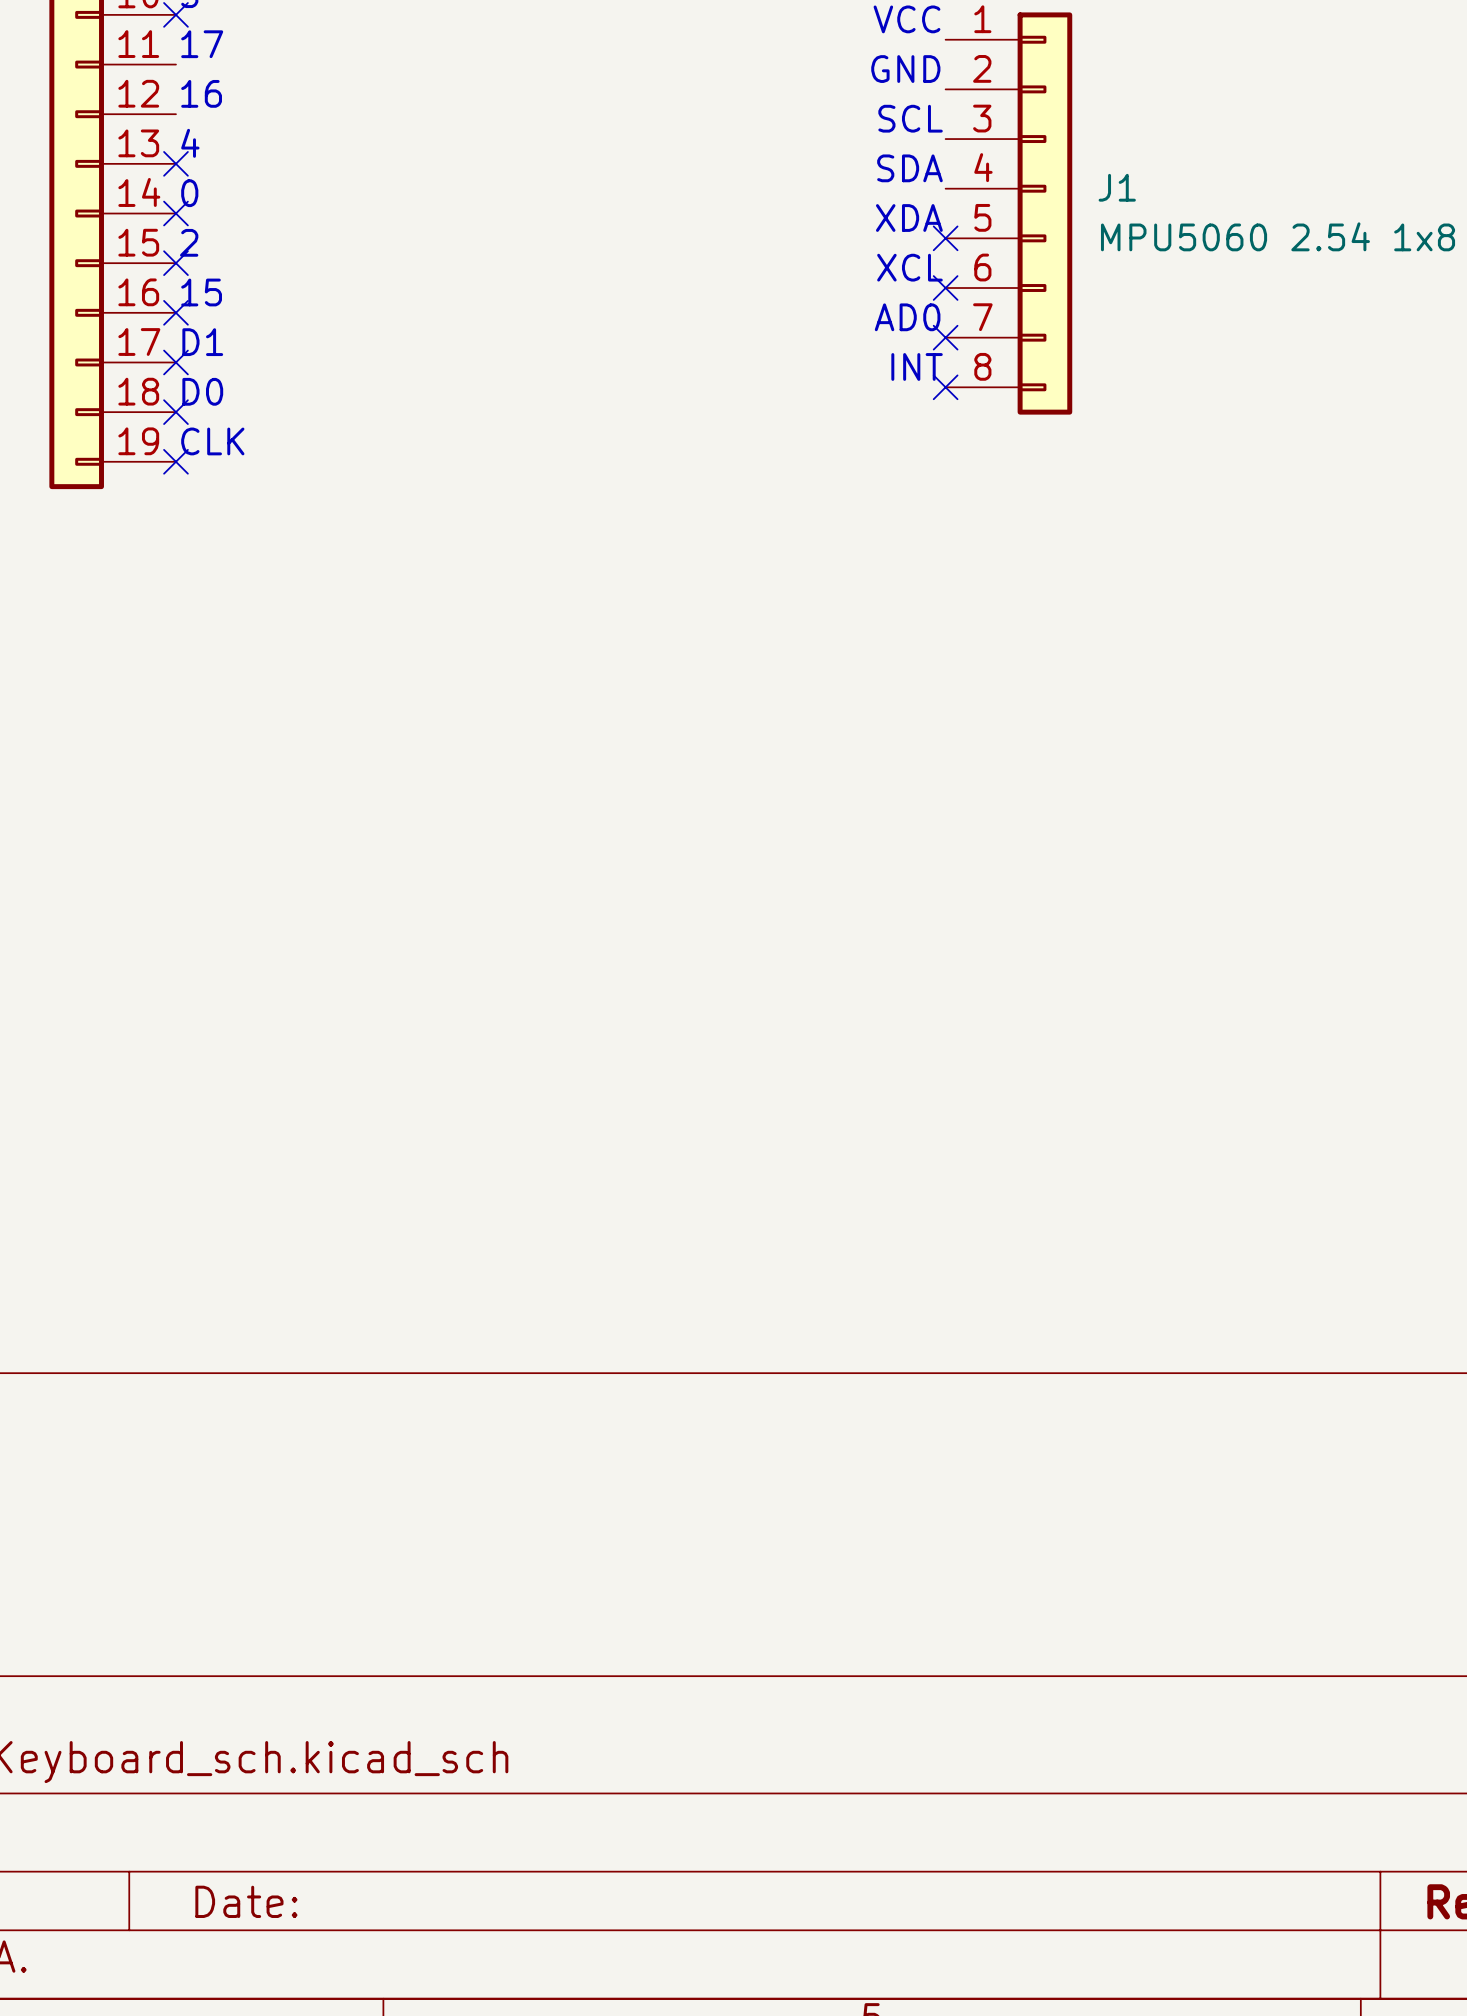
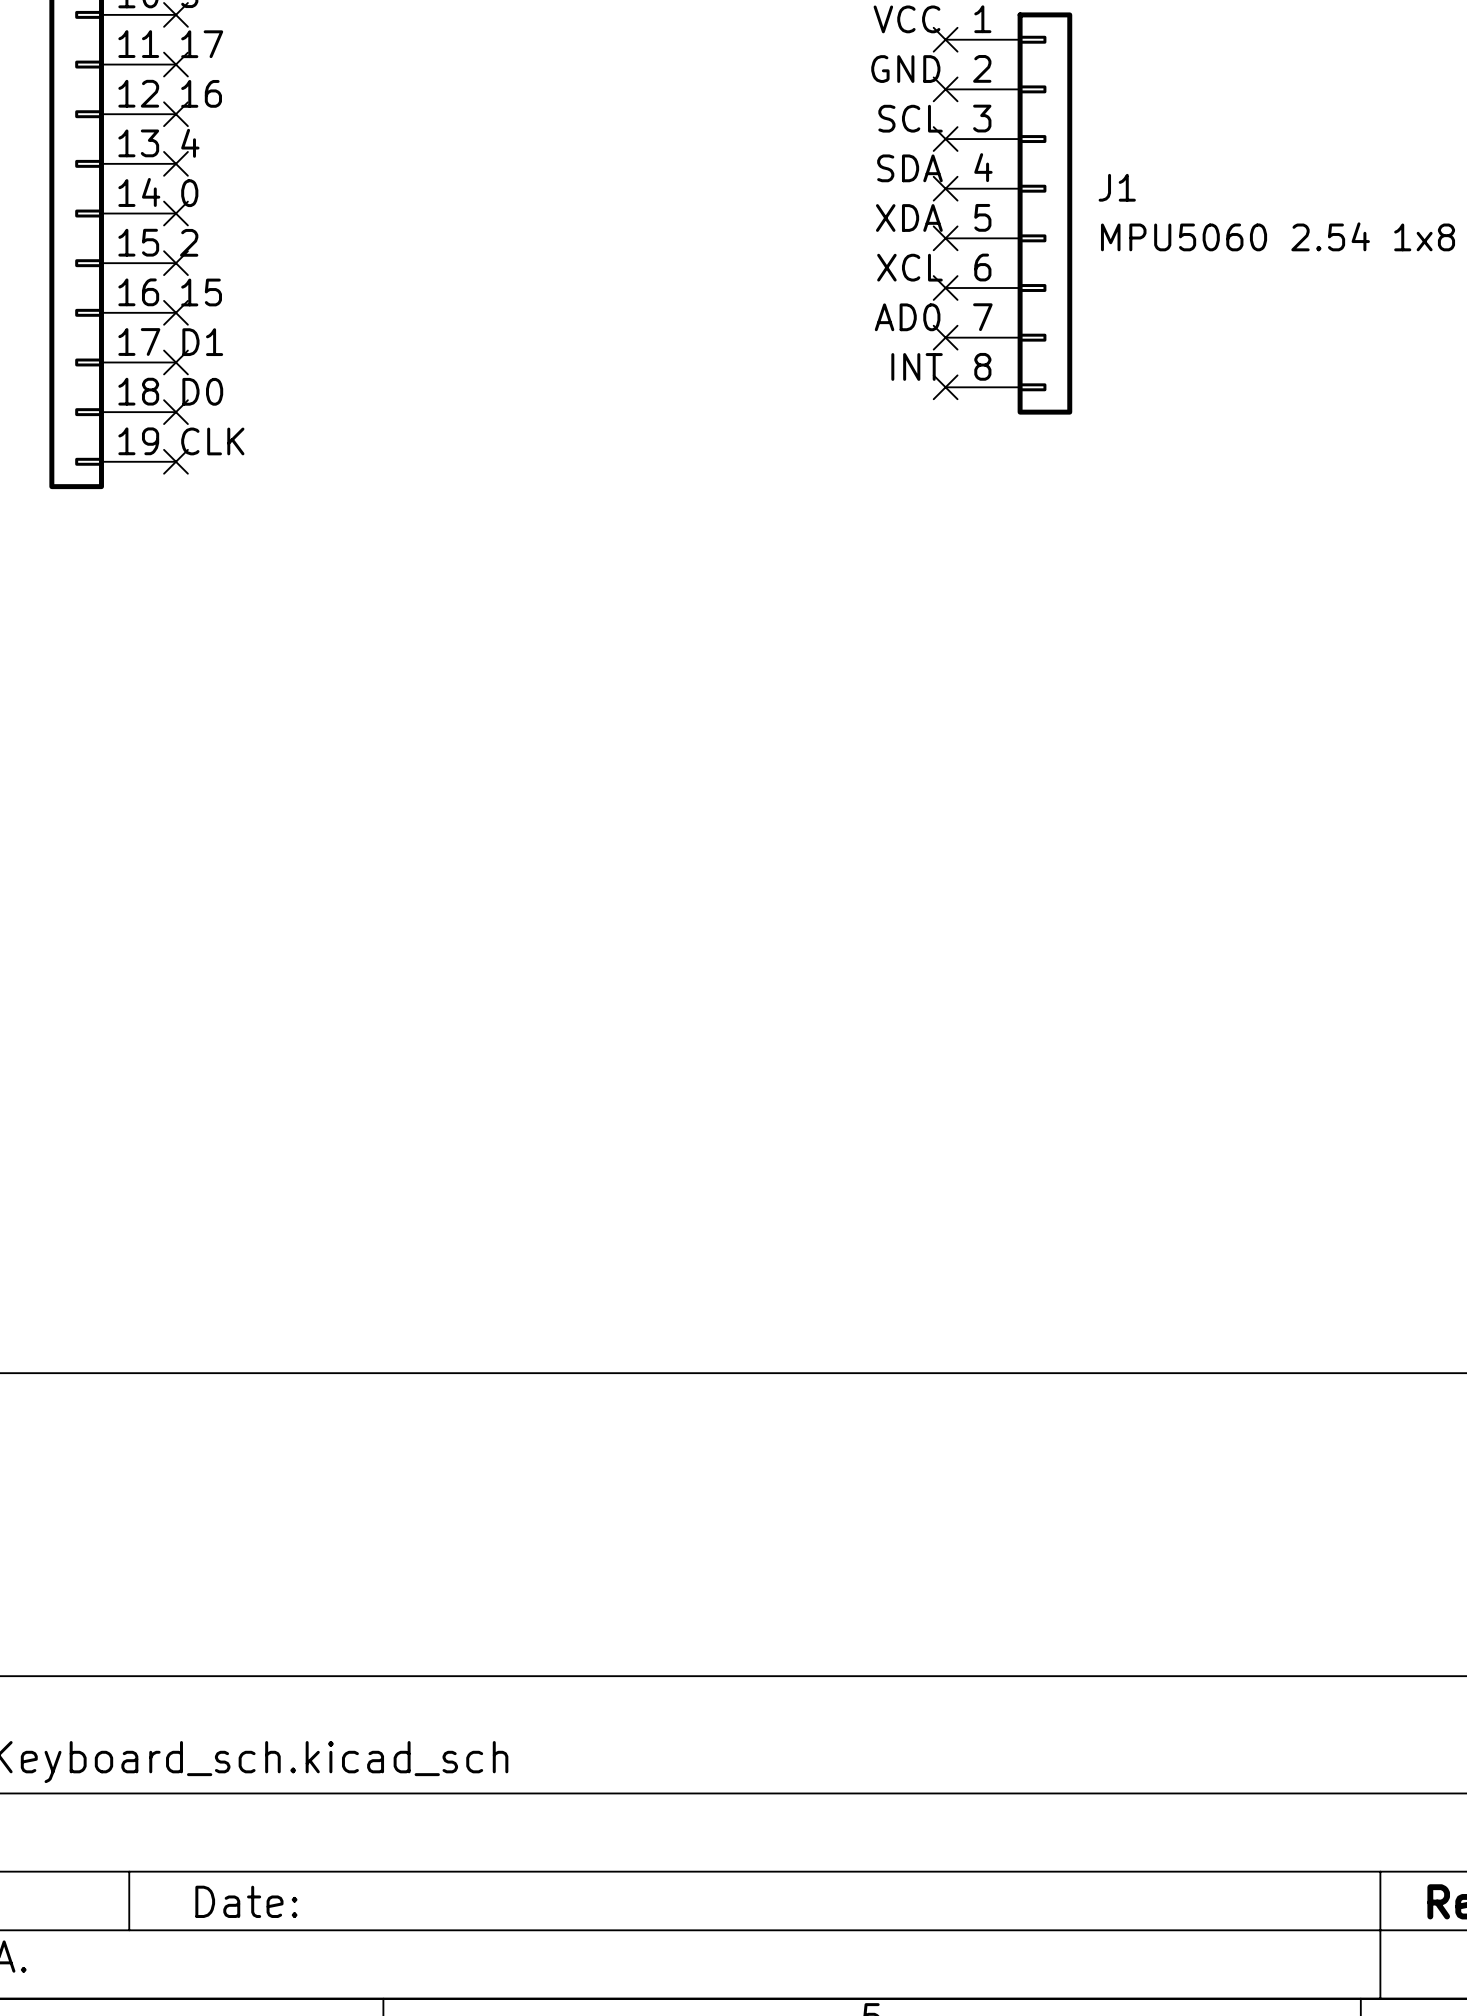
no-connect mark: none -> (945, 39)
no-connect mark: none -> (175, 64)
no-connect mark: none -> (945, 89)
no-connect mark: none -> (175, 114)
no-connect mark: none -> (945, 139)
no-connect mark: none -> (945, 188)

